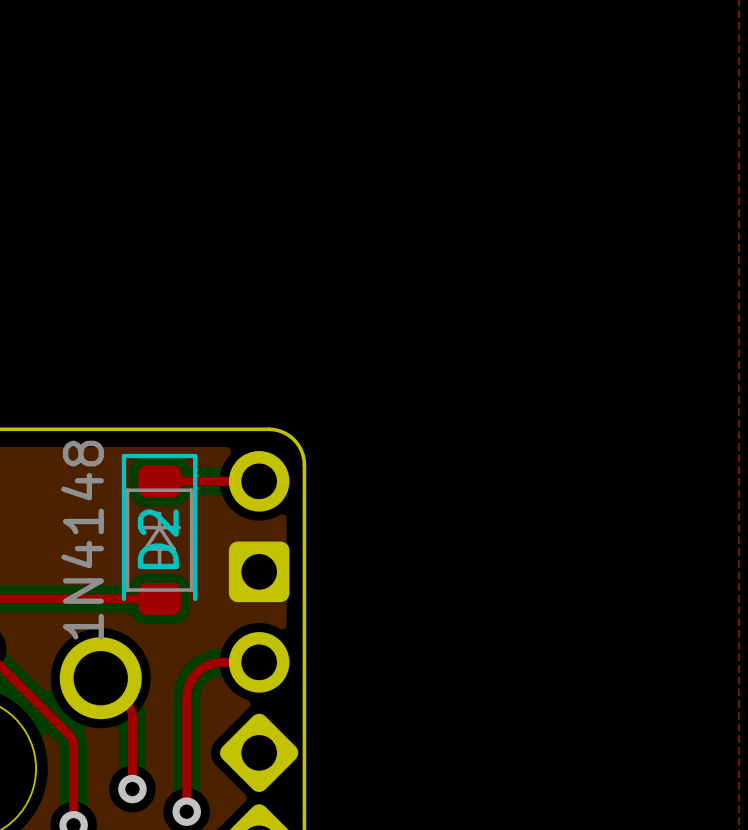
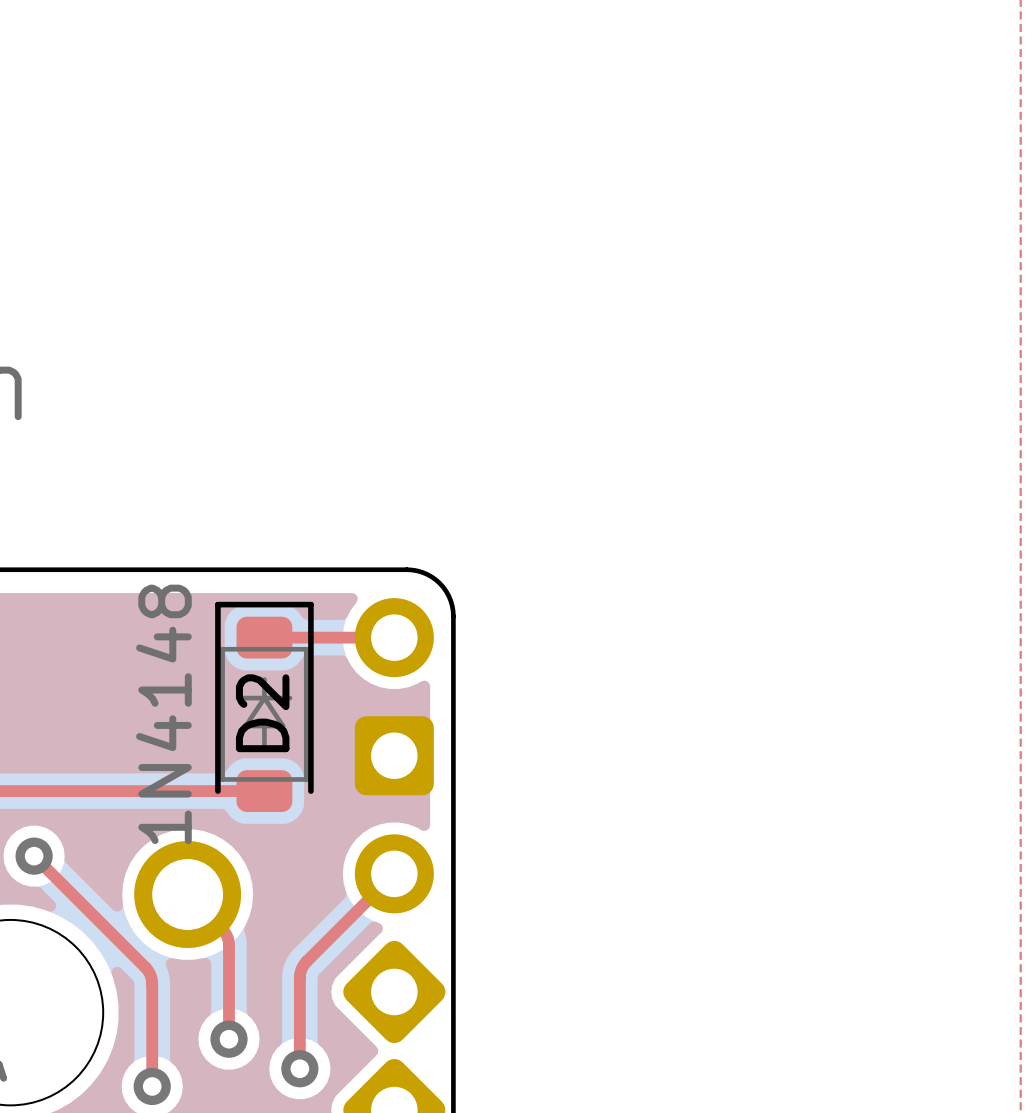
top track: (259, 662) (218, 662) (206, 665) (197, 672) (190, 682) (186, 694) (186, 742) -> (394, 873) (306, 961) (301, 969) (299, 977)

